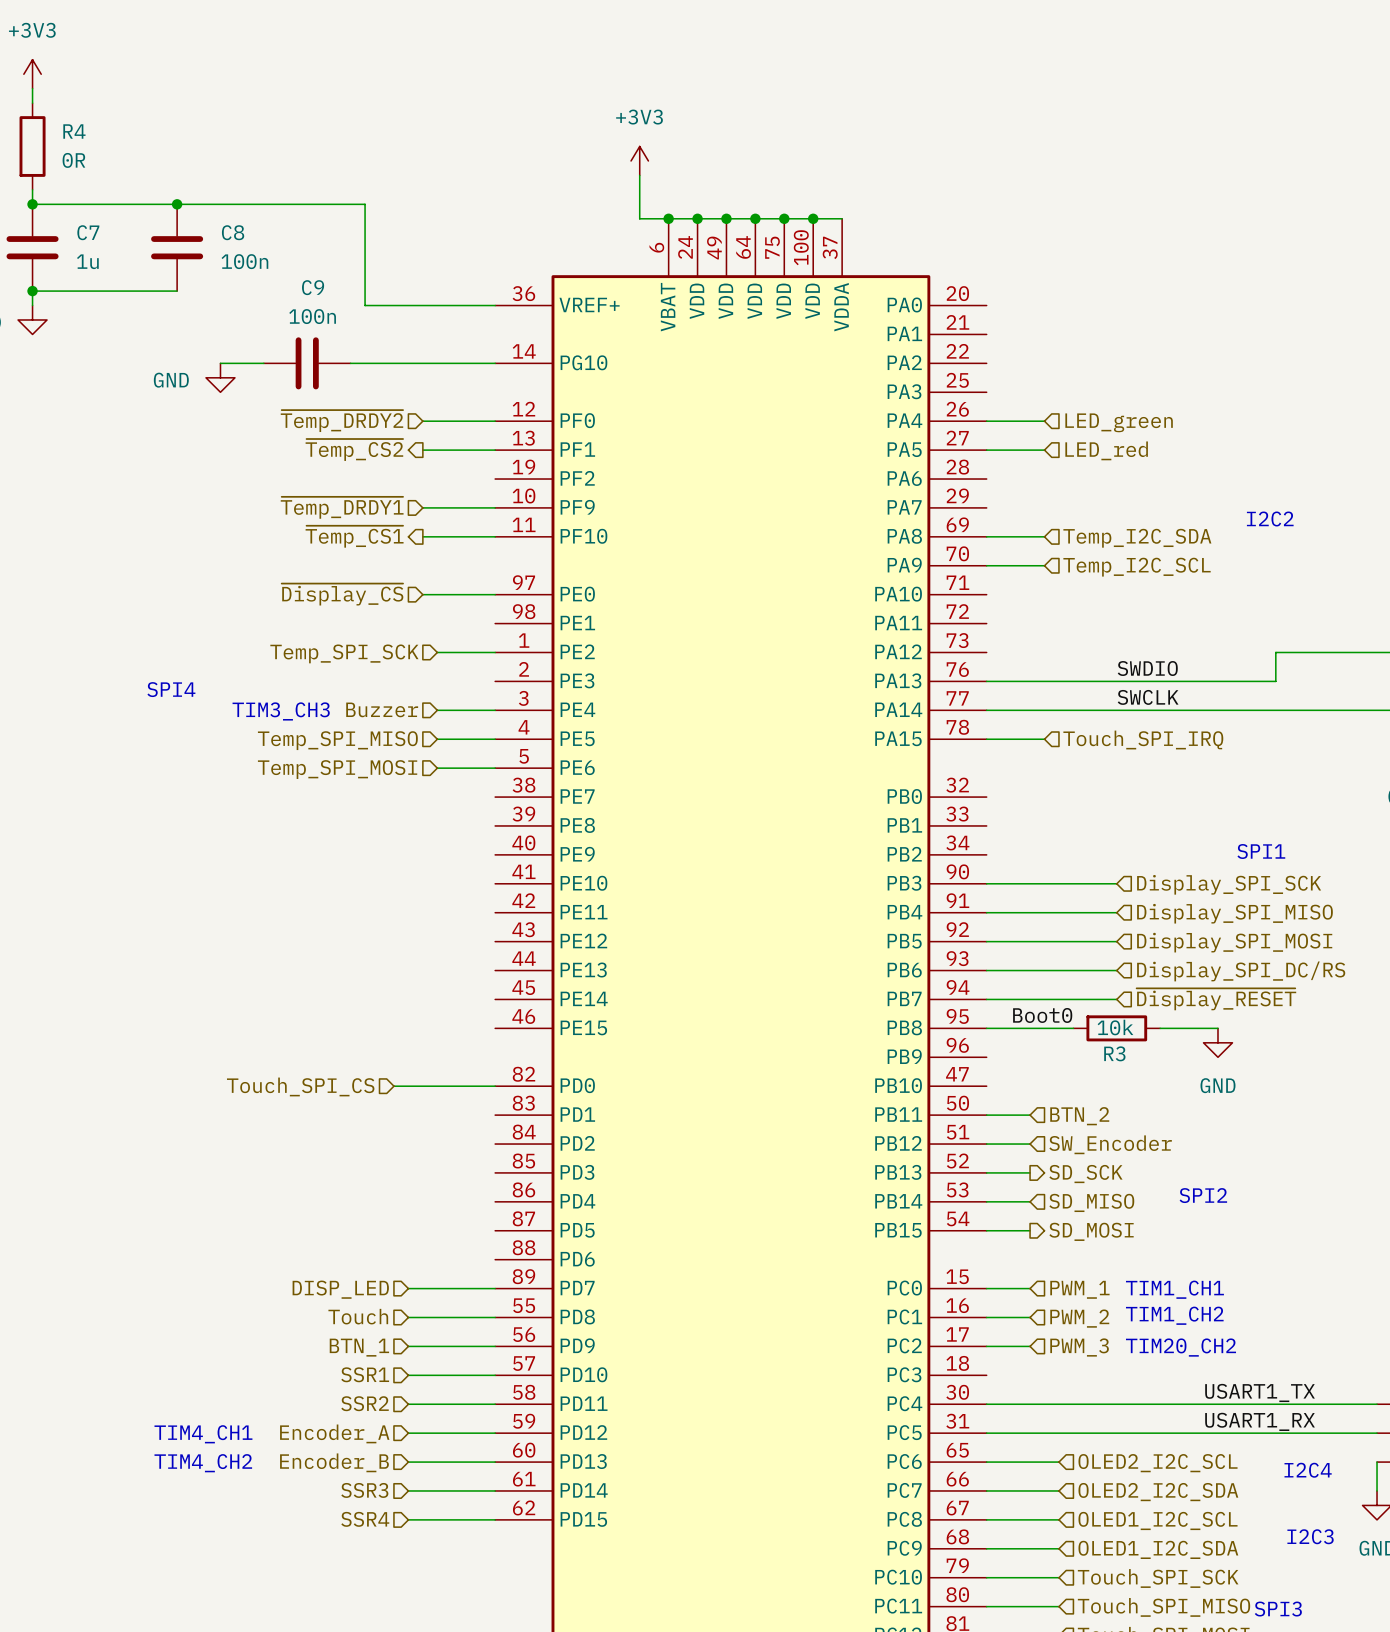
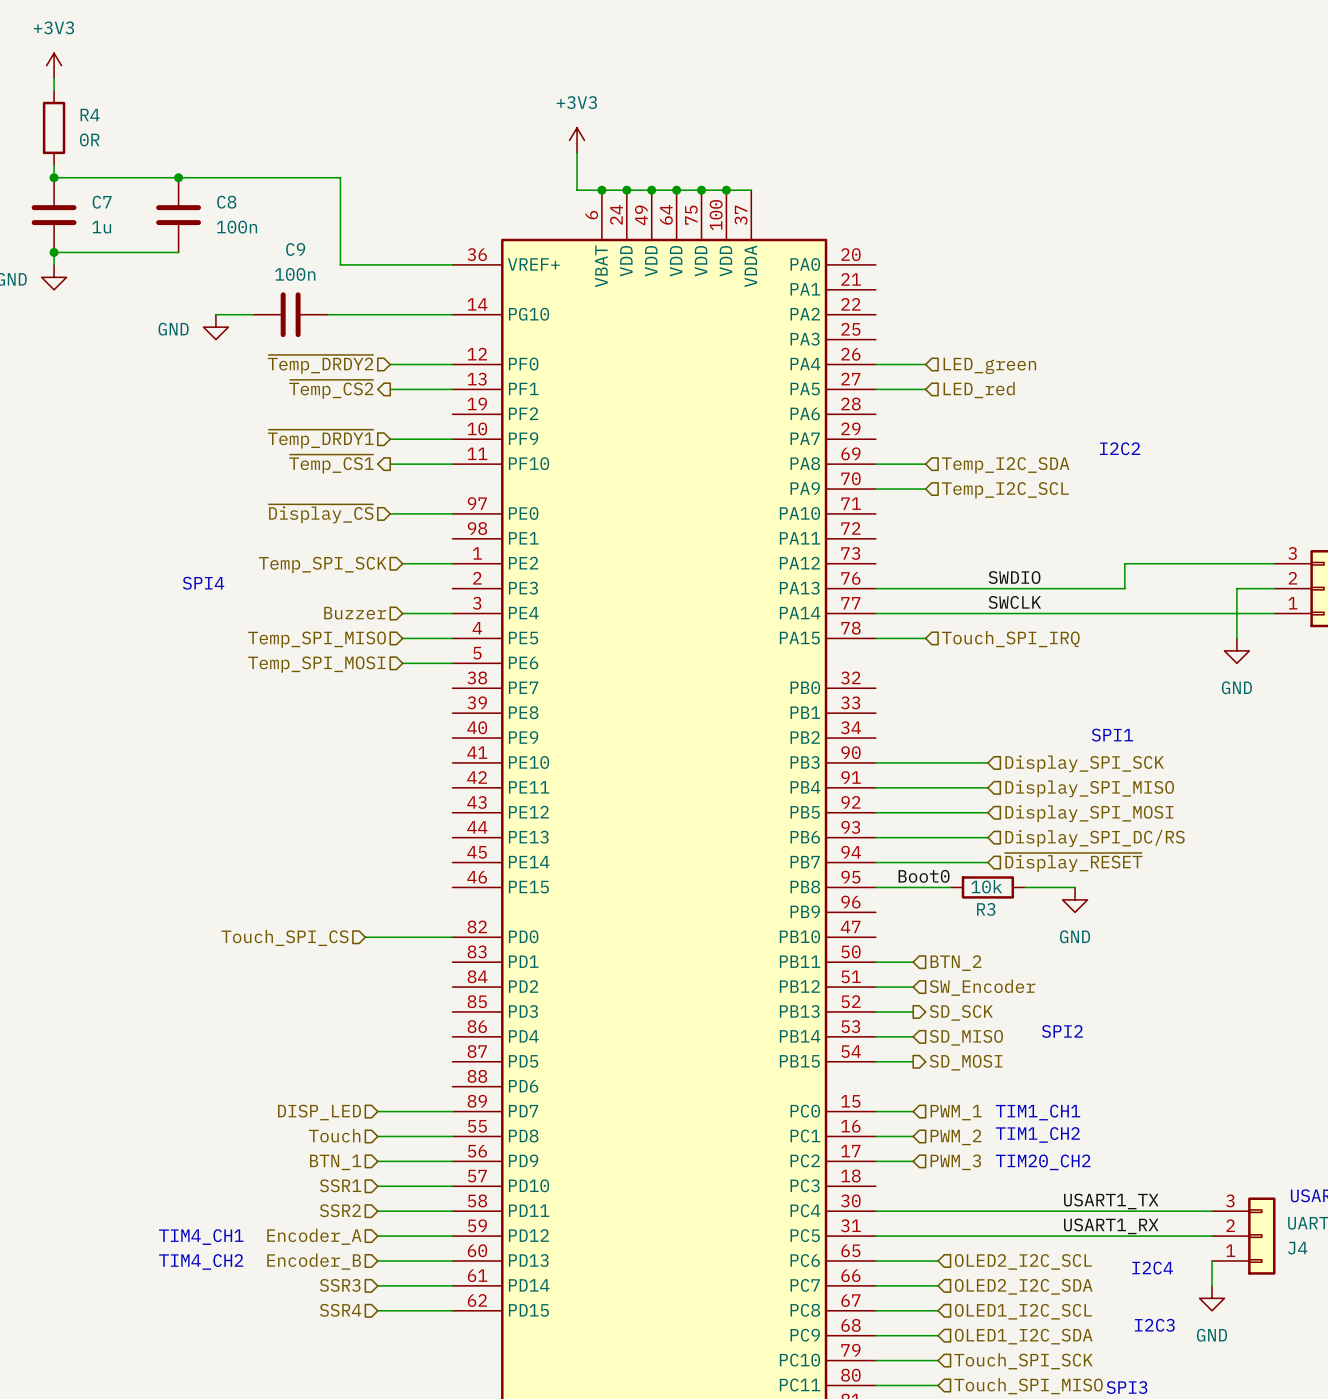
text position: SPI4 (171, 689) -> SPI4 (203, 583)
text: TIM3_CH3 (281, 711) -> none

